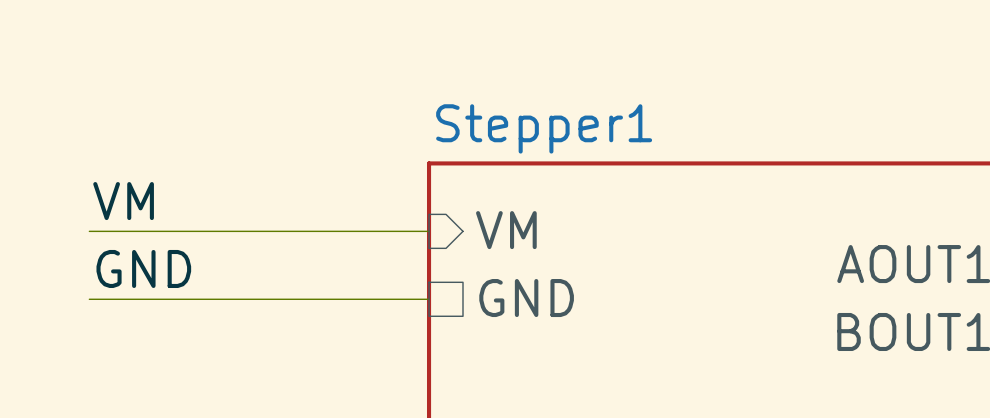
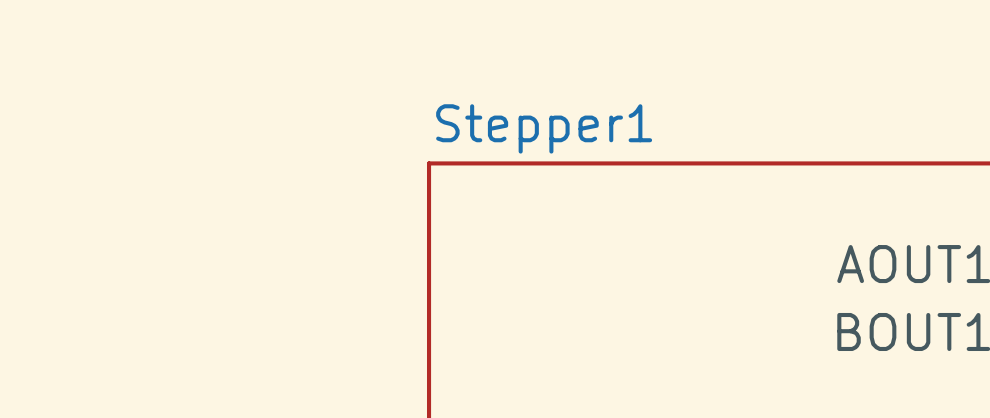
label: VM (123, 201) -> none
sheet pin: VM (506, 230) -> none
wire: (89, 231) (429, 231) -> none
label: GND (143, 268) -> none
sheet pin: GND (526, 298) -> none
wire: (89, 299) (429, 299) -> none

